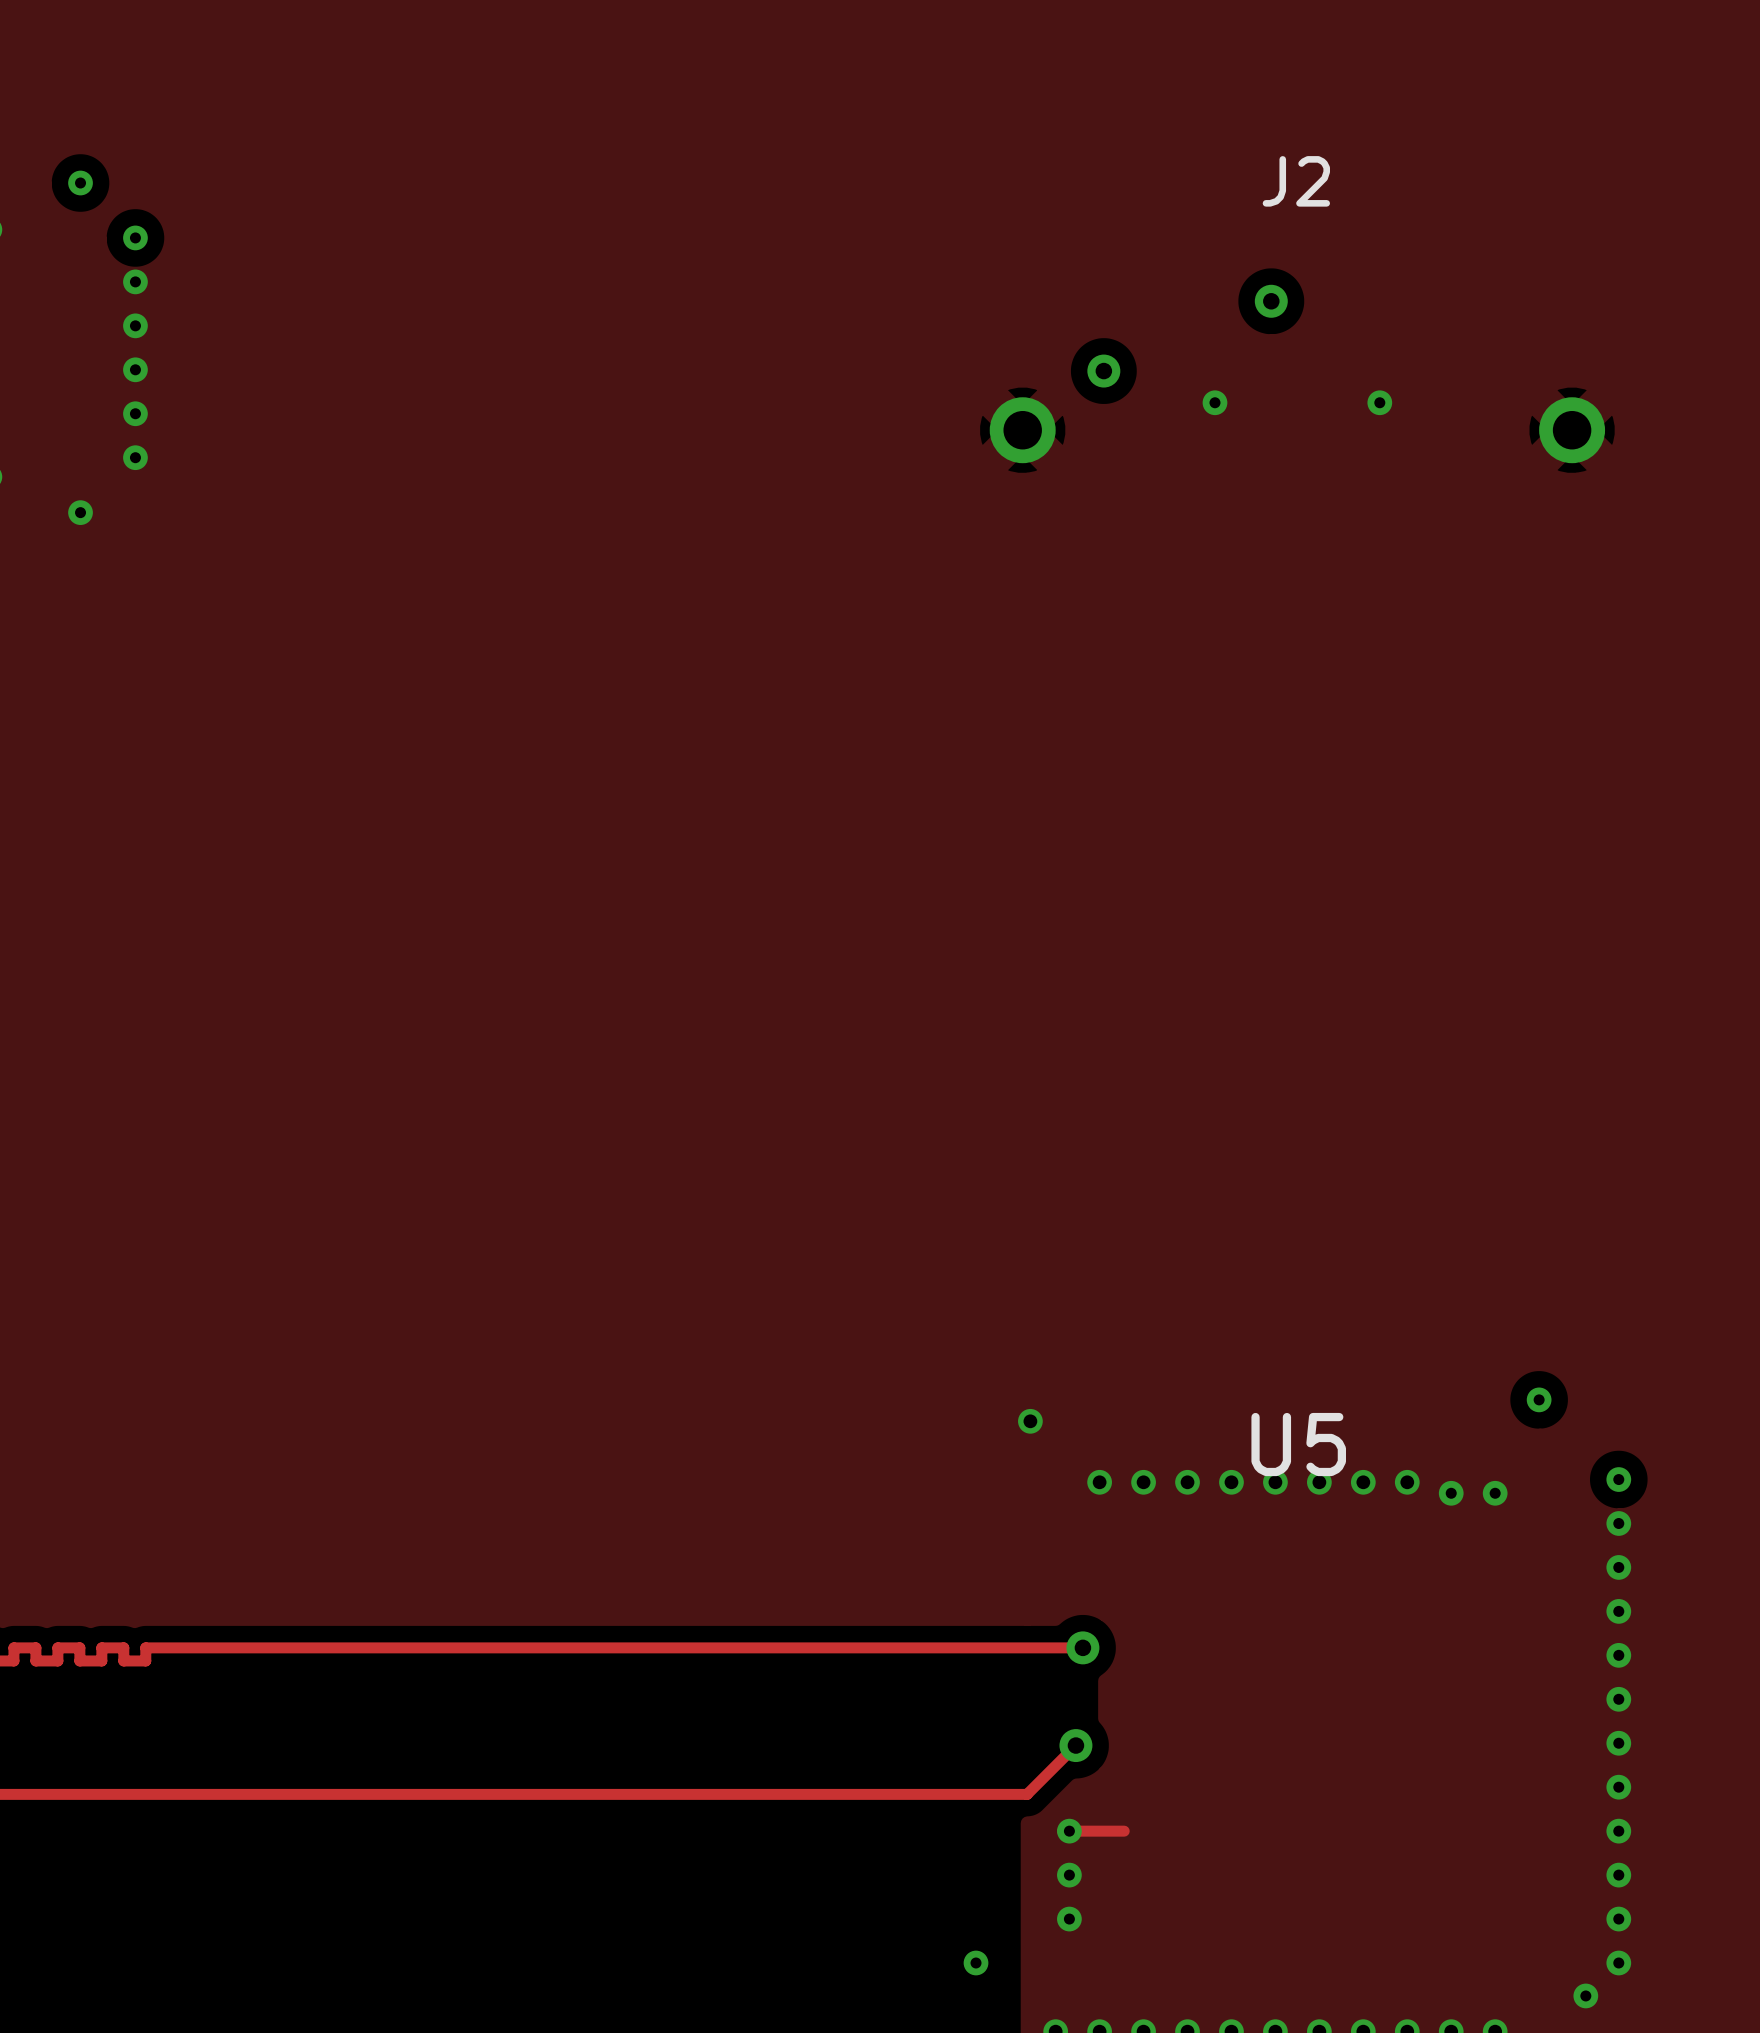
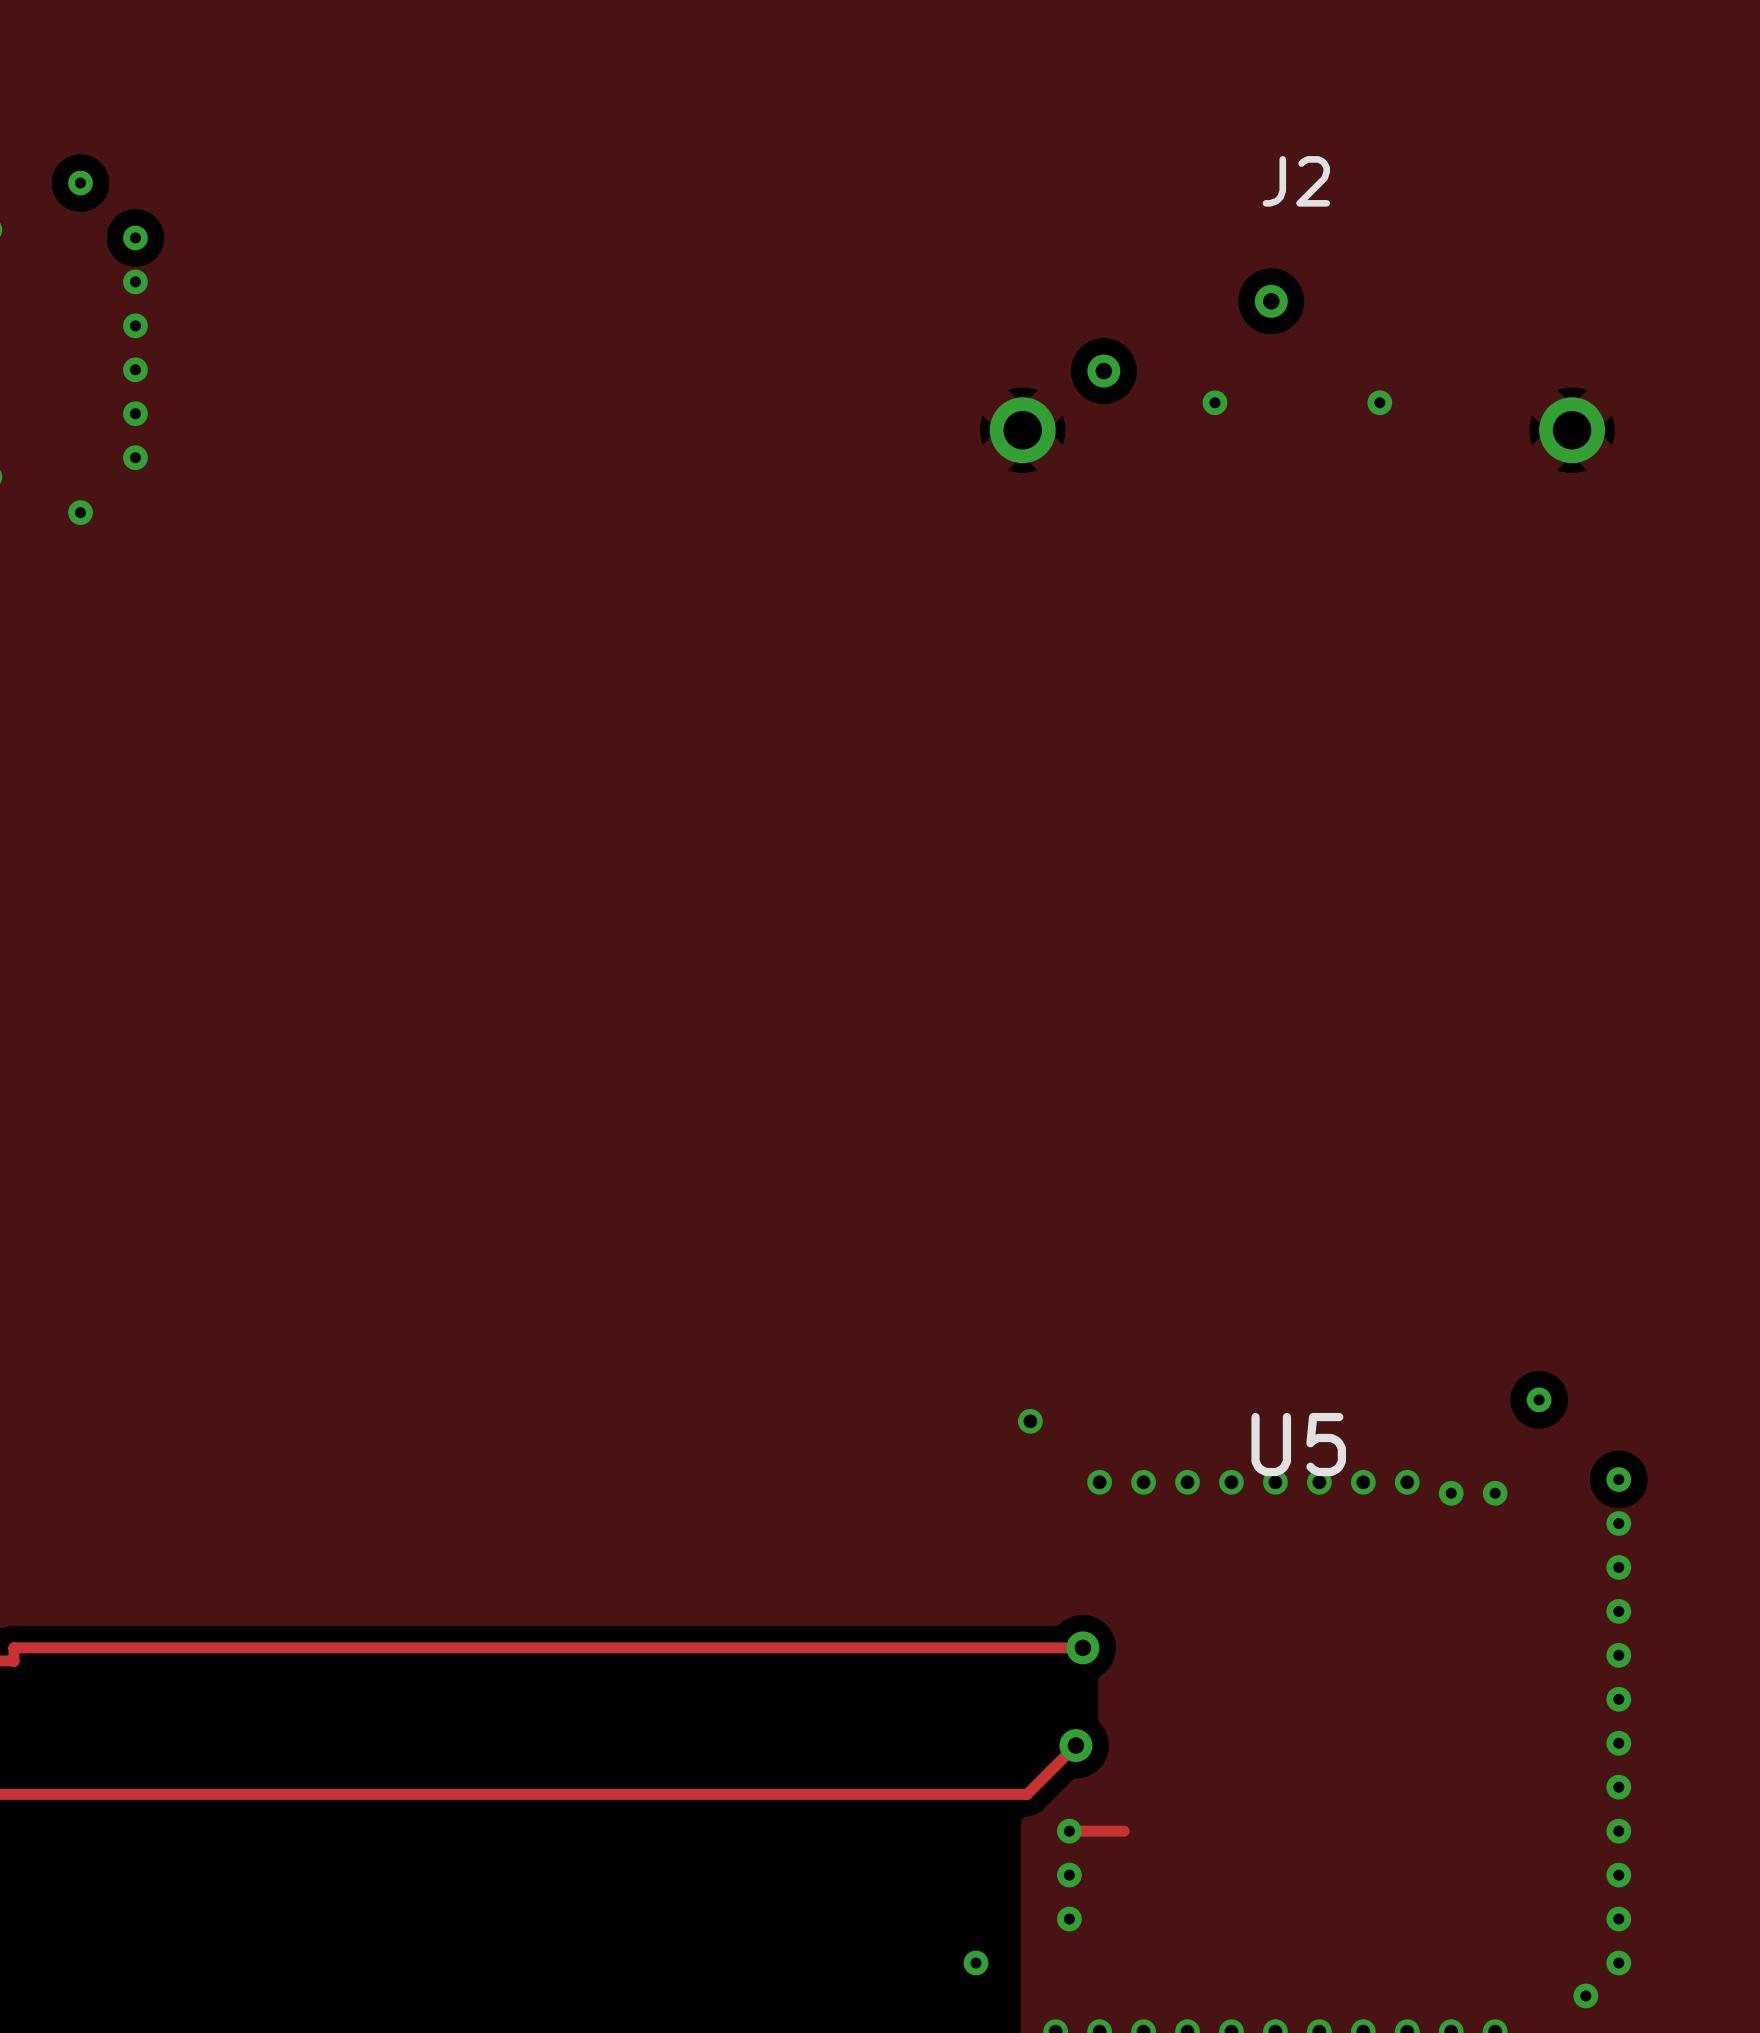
track: (35, 1647) (35, 1660) (57, 1660) (57, 1647) -> (35, 1647) (57, 1647)
track: (79, 1647) (79, 1660) (101, 1660) (101, 1647) -> (79, 1647) (101, 1647)
track: (123, 1647) (123, 1660) (145, 1660) (145, 1647) -> (123, 1647) (145, 1647)

